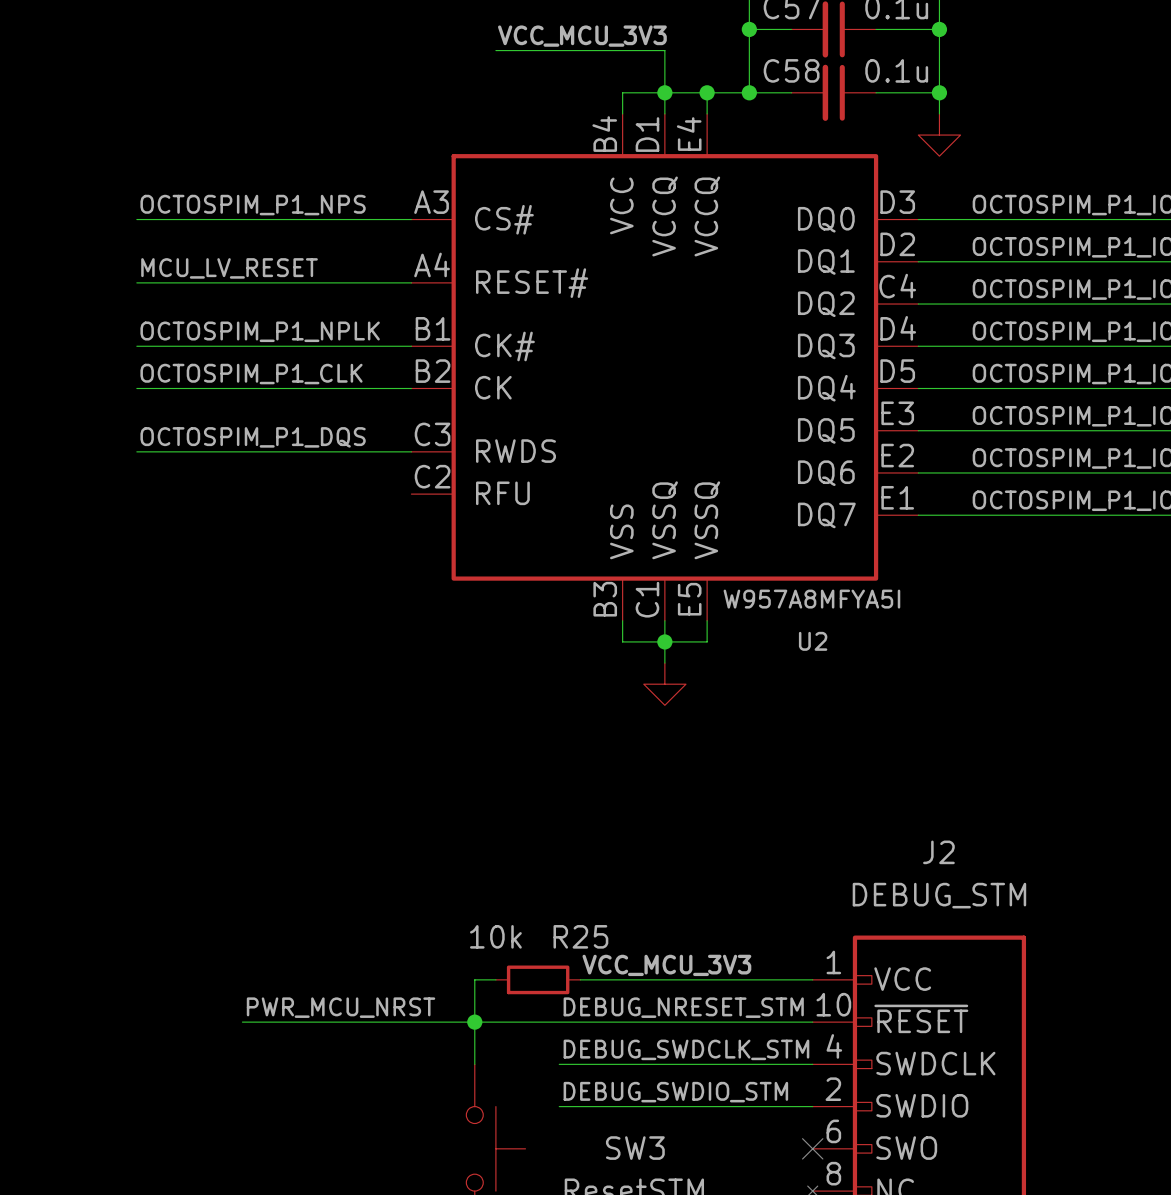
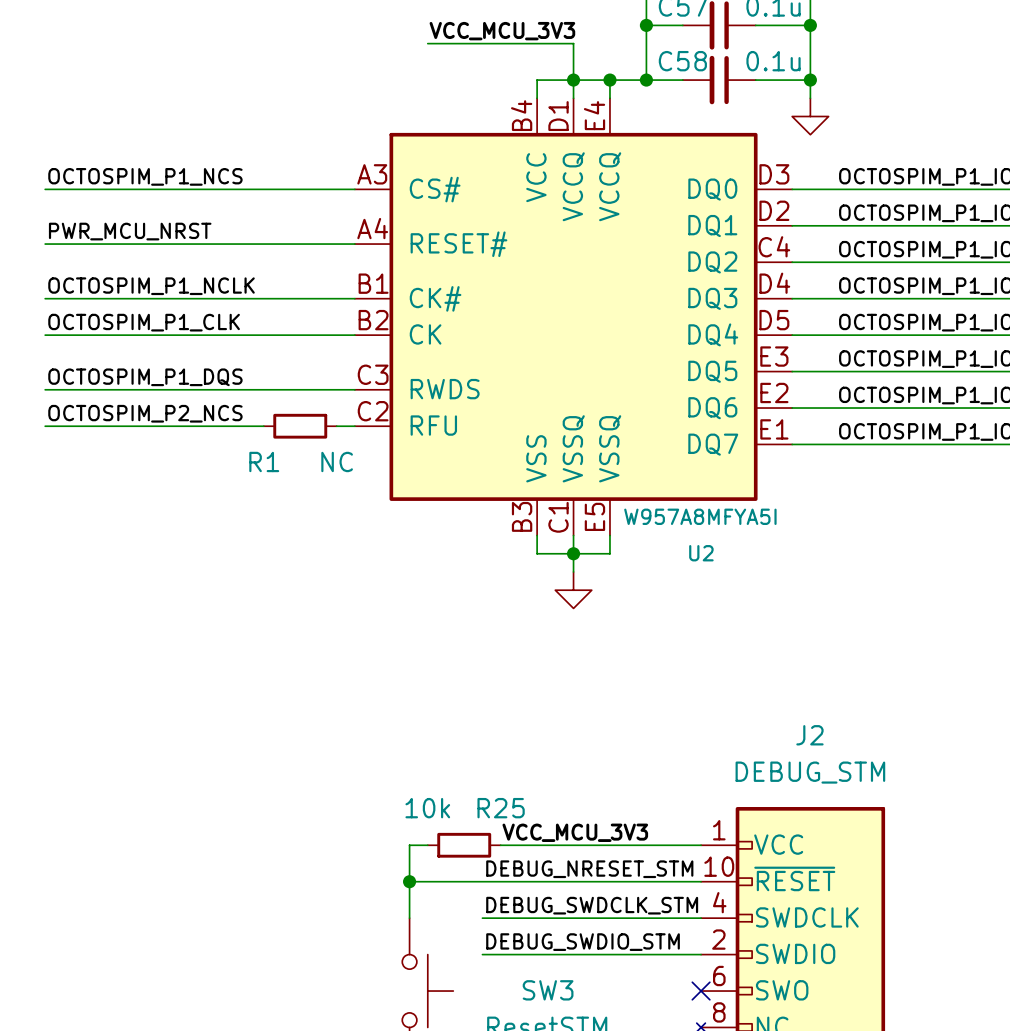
label: OCTOSPIM_P1_NPS (253, 205) -> OCTOSPIM_P1_NCS (145, 176)
wire: none -> (45, 189) (118, 189)
label: none -> PWR_MCU_NRST (130, 231)
label: MCU_LV_RESET (229, 268) -> none
wire: none -> (45, 244) (118, 244)
label: OCTOSPIM_P1_NPLK (260, 331) -> OCTOSPIM_P1_NCLK (151, 286)
wire: none -> (45, 298) (118, 298)
label position: OCTOSPIM_P1_CLK (251, 374) -> OCTOSPIM_P1_CLK (144, 322)
wire: none -> (45, 335) (118, 335)
label position: OCTOSPIM_P1_DQS (253, 437) -> OCTOSPIM_P1_DQS (145, 377)
wire: none -> (45, 389) (118, 389)
label: none -> OCTOSPIM_P2_NCS (145, 413)
wire: none -> (45, 426) (263, 426)
R1: none -> NC (300, 426)
wire: none -> (336, 426) (354, 426)
label: PWR_MCU_NRST (341, 1007) -> none
wire: (242, 1022) (474, 1022) -> none

